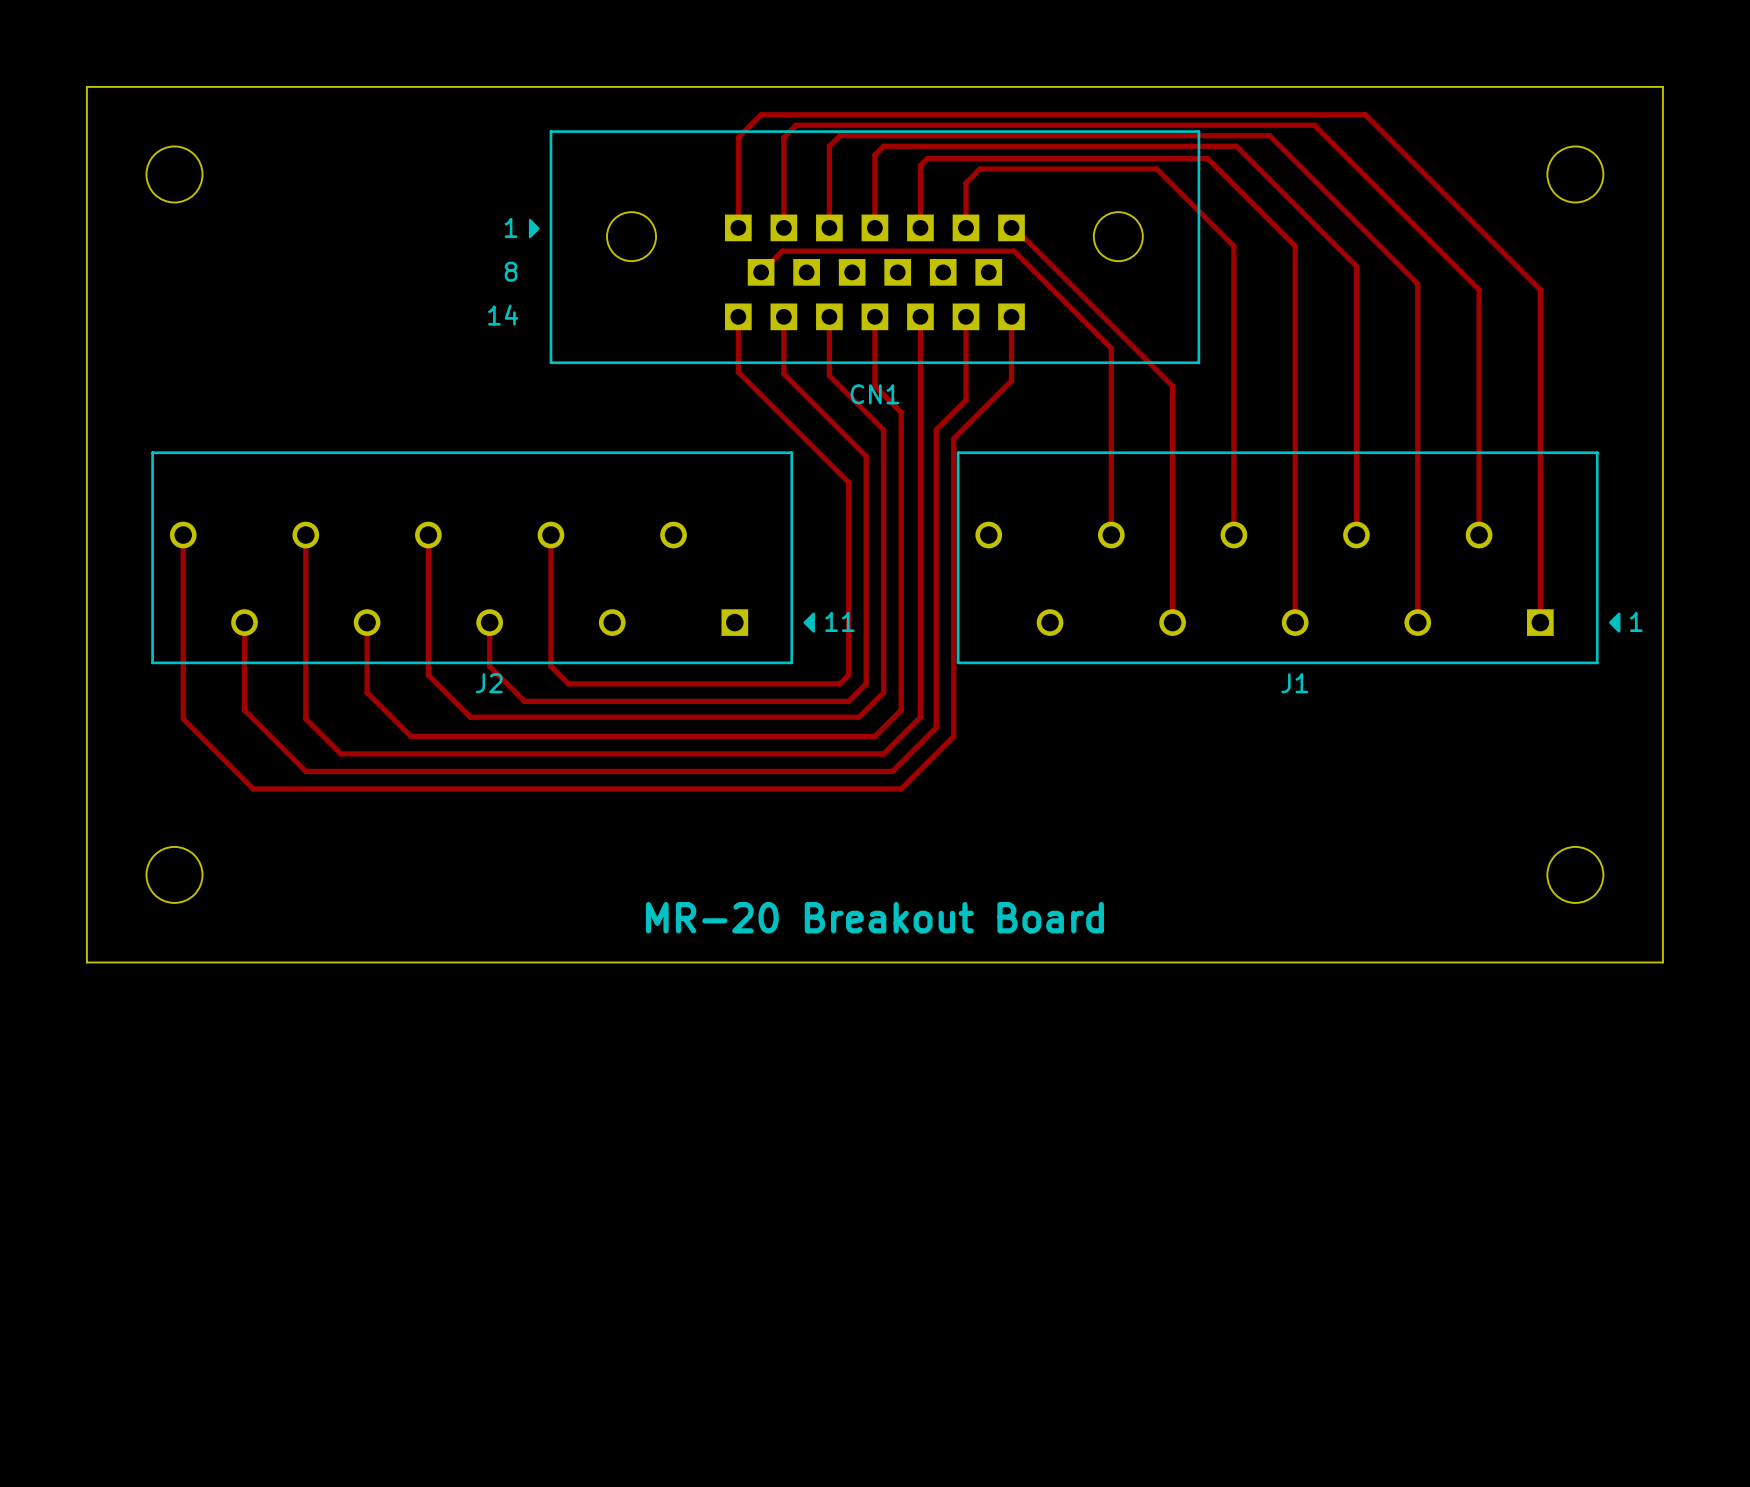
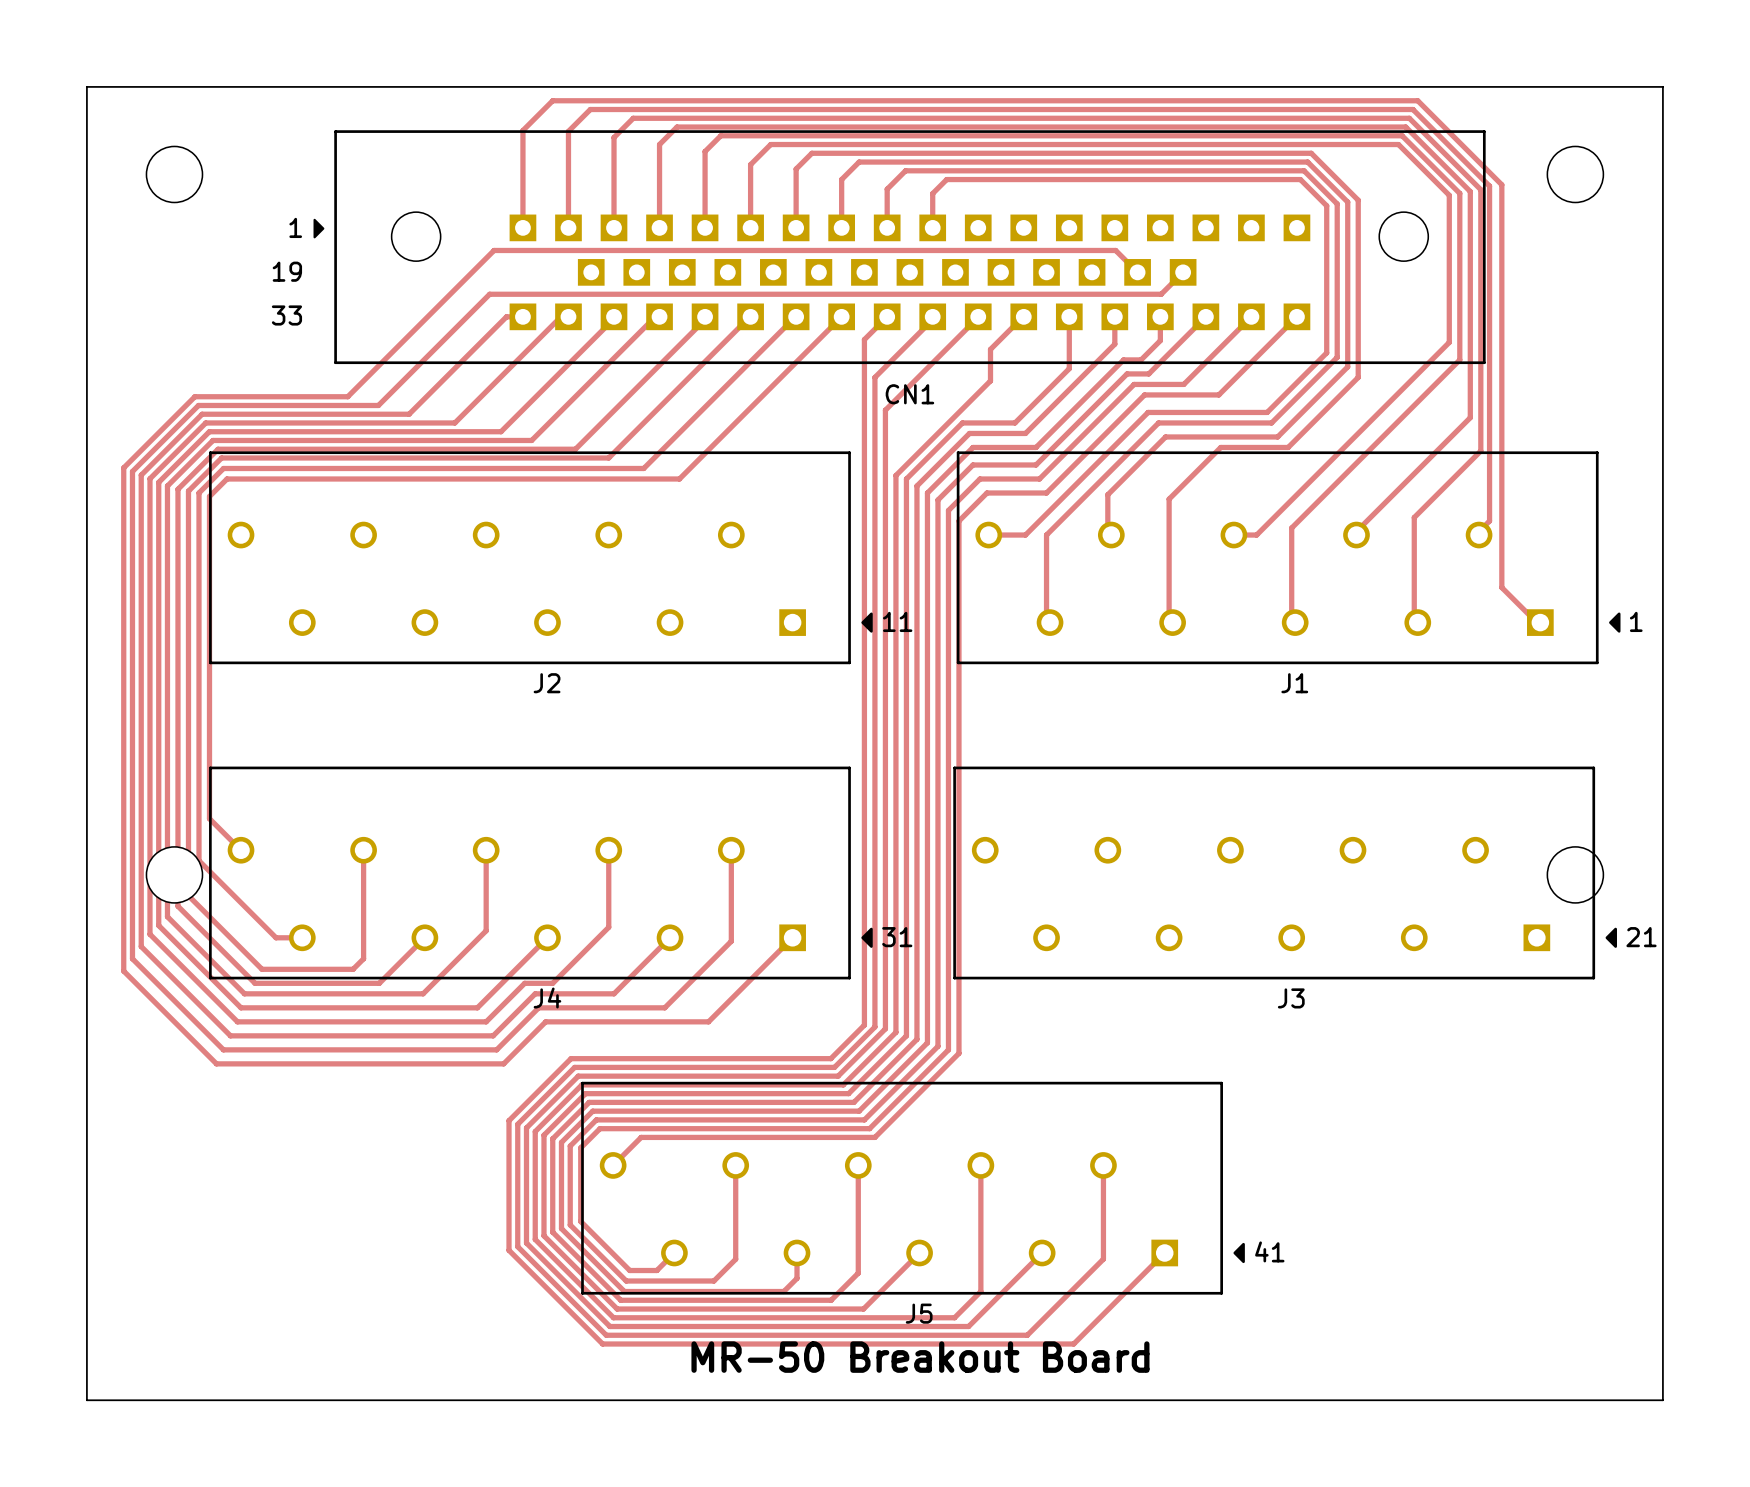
CN1 footprint: [528, 130, 1201, 365] -> [313, 130, 1486, 365]
track: (839, 135) (829, 146) (829, 227) -> (839, 135) (720, 135) (705, 151) (705, 227)
track: (1269, 135) (1417, 283) (1417, 622) -> (1269, 135) (1402, 135) (1459, 193) (1459, 359) (1291, 528) (1291, 622)
track: none -> (522, 227) (522, 130) (552, 100) (1417, 100) (1501, 184) (1501, 587) (1536, 622)
track: none -> (568, 227) (568, 131) (590, 109) (1412, 109) (1489, 186) (1489, 521) (1475, 535)
track: none -> (614, 227) (614, 137) (633, 118) (1409, 118) (1480, 189) (1480, 450) (1414, 517) (1414, 622)
track: none -> (659, 227) (659, 144) (677, 127) (1405, 127) (1470, 191) (1470, 417) (1352, 535)
track: (738, 227) (738, 137) (761, 114) (1365, 114) (1540, 289) (1540, 622) -> none
track: none -> (750, 227) (750, 164) (770, 144) (1398, 144) (1449, 195) (1449, 342) (1256, 535) (1230, 535)
track: (783, 227) (783, 137) (796, 125) (1314, 125) (1479, 289) (1479, 535) -> none
track: none -> (796, 227) (796, 169) (811, 153) (1311, 153) (1358, 200) (1358, 377) (1288, 447) (1220, 447) (1169, 499) (1169, 622)
track: none -> (841, 227) (841, 179) (859, 162) (1307, 162) (1347, 202) (1347, 366) (1277, 436) (1165, 436) (1107, 494) (1107, 535)
track: (874, 227) (874, 155) (883, 146) (1236, 146) (1356, 266) (1356, 535) -> none
track: none -> (887, 227) (887, 189) (905, 170) (1304, 170) (1337, 203) (1337, 357) (1271, 422) (1158, 422) (1046, 535) (1046, 622)
track: (920, 227) (920, 165) (927, 158) (1207, 158) (1295, 246) (1295, 622) -> none
track: none -> (932, 227) (932, 193) (946, 179) (1300, 179) (1326, 205) (1326, 352) (1267, 412) (1148, 412) (1025, 535) (985, 535)
track: (965, 227) (965, 183) (979, 169) (1156, 169) (1233, 246) (1233, 535) -> none
track: (1011, 227) (1014, 227) (1172, 386) (1172, 622) -> none
track: (761, 272) (782, 251) (1014, 251) (1111, 348) (1111, 535) -> none
track: none -> (1137, 272) (1115, 250) (494, 250) (347, 396) (194, 396) (123, 467) (123, 971) (216, 1063) (503, 1063) (545, 1021) (708, 1021) (792, 937)
track: none -> (1183, 272) (1161, 294) (489, 294) (378, 405) (198, 405) (132, 471) (132, 958) (223, 1049) (496, 1049) (538, 1007) (664, 1007) (731, 941) (731, 850)
track: none -> (522, 316) (506, 316) (409, 414) (202, 414) (141, 475) (141, 946) (230, 1035) (493, 1035) (535, 993) (614, 993) (670, 937)
track: none -> (568, 316) (561, 316) (454, 422) (205, 422) (149, 478) (149, 934) (237, 1021) (486, 1021) (524, 983) (552, 983) (608, 927) (608, 850)
track: none -> (614, 316) (501, 431) (209, 431) (158, 482) (158, 925) (241, 1007) (477, 1007) (547, 937)
track: none -> (659, 316) (655, 316) (531, 440) (213, 440) (167, 486) (167, 916) (244, 993) (423, 993) (486, 930) (486, 850)
track: none -> (705, 316) (705, 319) (575, 449) (218, 449) (177, 489) (177, 906) (255, 983) (379, 983) (424, 937)
track: (738, 316) (738, 372) (848, 482) (848, 675) (839, 683) (568, 683) (550, 666) (550, 535) -> none
track: none -> (750, 316) (608, 457) (221, 457) (188, 491) (188, 895) (262, 969) (353, 969) (363, 958) (363, 850)
track: (783, 316) (783, 373) (866, 456) (866, 683) (848, 701) (524, 701) (489, 666) (489, 622) -> none
track: none -> (796, 316) (643, 468) (223, 468) (198, 493) (198, 860) (276, 937) (302, 937)
track: (829, 316) (829, 375) (883, 429) (883, 692) (859, 717) (470, 717) (428, 675) (428, 535) -> none
track: none -> (841, 316) (679, 479) (227, 479) (209, 496) (209, 818) (241, 850)
track: (874, 316) (874, 377) -> (932, 316) (932, 319) (874, 377)
track: none -> (887, 316) (864, 339) (864, 1025) (830, 1058) (571, 1058) (509, 1120) (509, 1250) (602, 1344) (1073, 1344) (1164, 1252)
track: (920, 316) (920, 717) (883, 753) (340, 753) (305, 718) (305, 535) -> none
track: (965, 316) (965, 400) (936, 429) (936, 727) (892, 771) (305, 771) (244, 710) (244, 622) -> none
track: none -> (978, 316) (885, 410) (885, 1028) (838, 1076) (578, 1076) (526, 1127) (526, 1243) (609, 1326) (968, 1326) (1042, 1252)
track: (1011, 316) (1011, 380) (953, 438) (953, 736) (901, 788) (253, 788) (183, 718) (183, 535) -> none
track: none -> (1023, 316) (990, 349) (990, 380) (895, 475) (895, 1032) (843, 1084) (581, 1084) (535, 1131) (535, 1239) (613, 1317) (954, 1317) (980, 1291) (980, 1165)
track: none -> (1069, 316) (1069, 368) (1015, 422) (962, 422) (906, 479) (906, 1035) (848, 1093) (585, 1093) (543, 1135) (543, 1235) (617, 1309) (863, 1309) (919, 1252)
track: none -> (1114, 316) (1114, 344) (1025, 433) (969, 433) (916, 486) (916, 1039) (853, 1102) (589, 1102) (552, 1138) (552, 1232) (620, 1300) (831, 1300) (858, 1273) (858, 1165)
track: none -> (1160, 316) (1160, 340) (1141, 359) (1123, 359) (1036, 447) (972, 447) (927, 493) (927, 1042) (859, 1111) (592, 1111) (561, 1142) (561, 1228) (624, 1291) (783, 1291) (797, 1278) (797, 1252)
track: none -> (1205, 316) (1148, 373) (1127, 373) (1036, 464) (972, 464) (937, 500) (937, 1046) (864, 1119) (596, 1119) (570, 1146) (570, 1224) (626, 1281) (713, 1281) (735, 1259) (735, 1165)
track: none -> (1251, 316) (1183, 384) (1134, 384) (1039, 479) (979, 479) (948, 510) (948, 1049) (869, 1128) (599, 1128) (580, 1147) (580, 1221) (629, 1270) (656, 1270) (674, 1252)
track: none -> (1296, 316) (1218, 394) (1144, 394) (1046, 493) (987, 493) (958, 521) (958, 1053) (874, 1137) (641, 1137) (613, 1165)
track: (874, 386) (901, 412) (901, 710) (874, 736) (410, 736) (367, 692) (367, 622) -> (874, 386) (874, 1026) (834, 1067) (574, 1067) (517, 1124) (517, 1246) (606, 1335) (1027, 1335) (1103, 1259) (1103, 1165)
J2 position: (483, 557) -> (540, 557)
J4: none -> (540, 873)
J3: none -> (1285, 873)
text: MR-20 Breakout Board (874, 917) -> none
board edge: (86, 962) (1662, 962) -> (86, 962) (86, 1400) (1662, 1400) (1662, 962)
J5: none -> (913, 1188)
text: none -> MR-50 Breakout Board (920, 1357)

